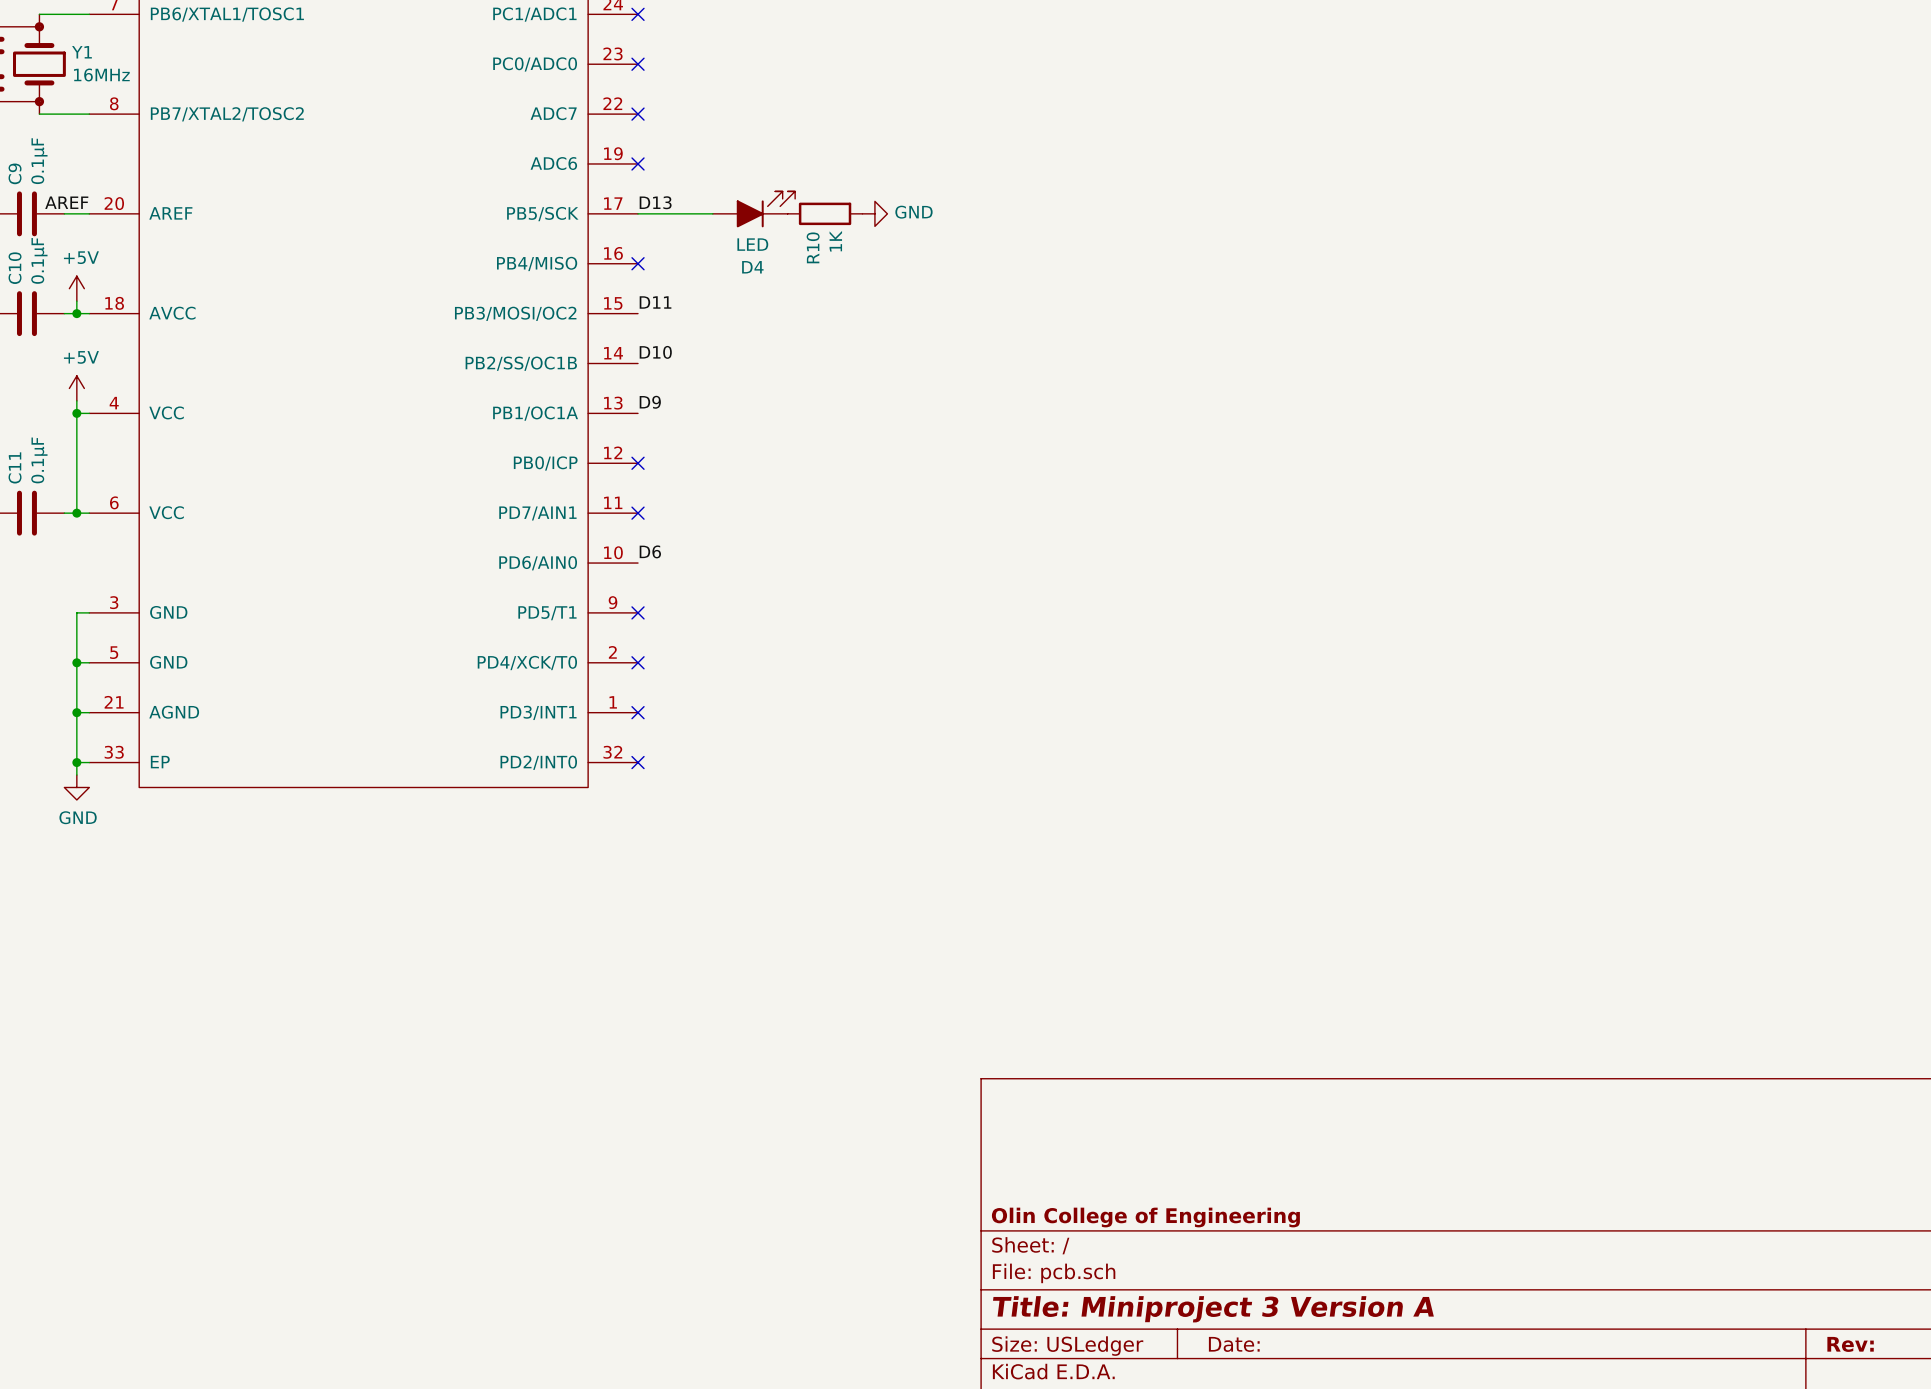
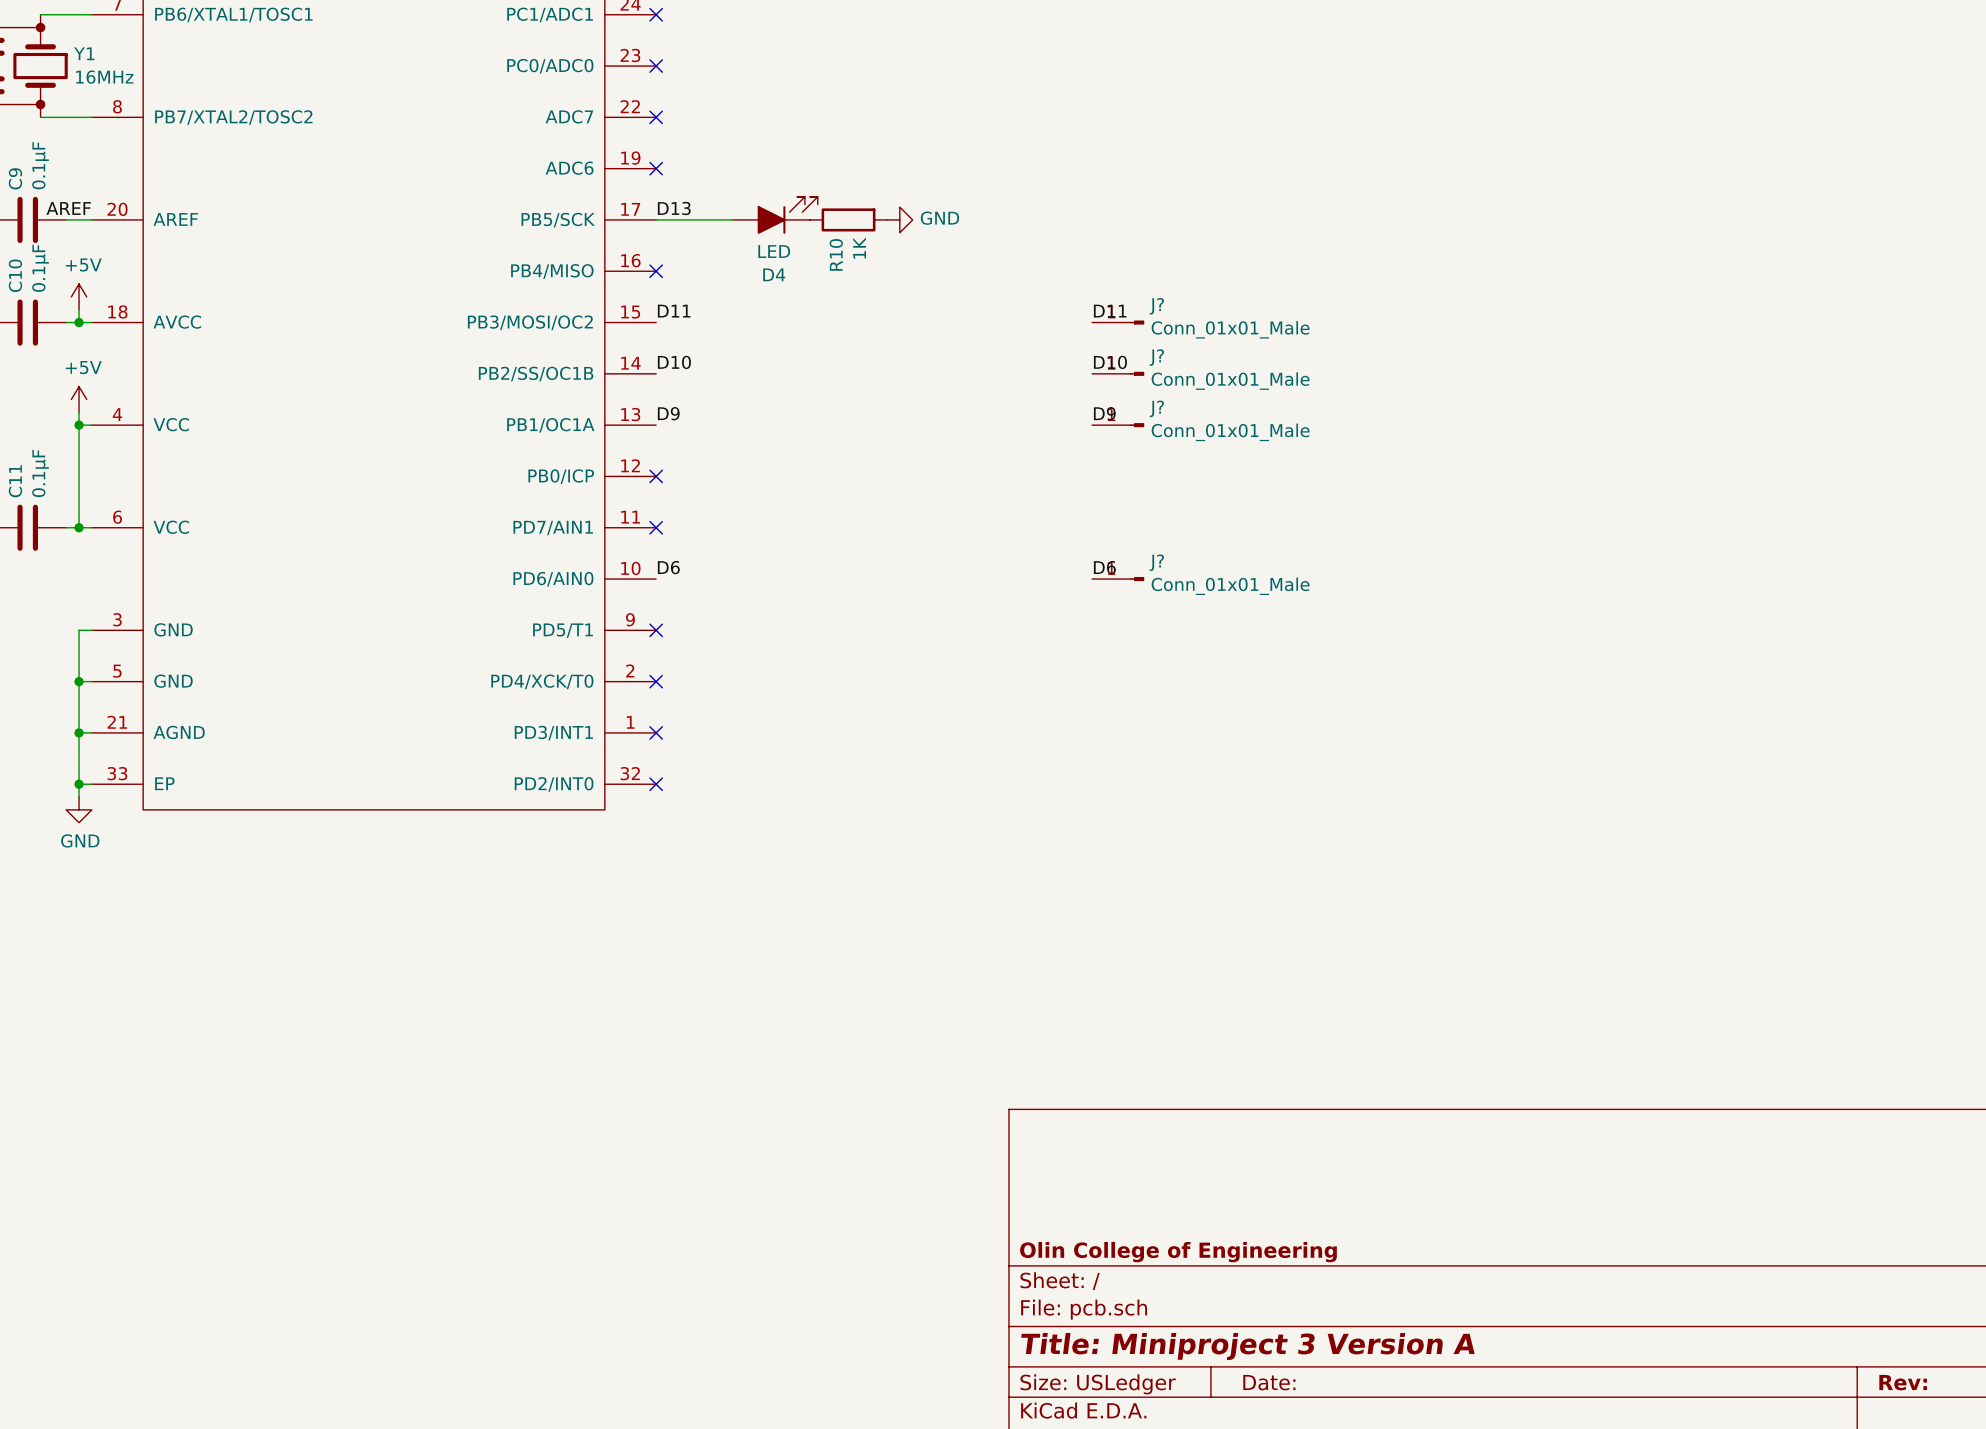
label: none -> D11 (1110, 311)
J?: none -> Conn_01x01_Male (1118, 322)
label: none -> D10 (1110, 362)
J?: none -> Conn_01x01_Male (1118, 373)
label: none -> D9 (1104, 413)
J?: none -> Conn_01x01_Male (1118, 425)
label: none -> D6 (1104, 567)
J?: none -> Conn_01x01_Male (1118, 579)

